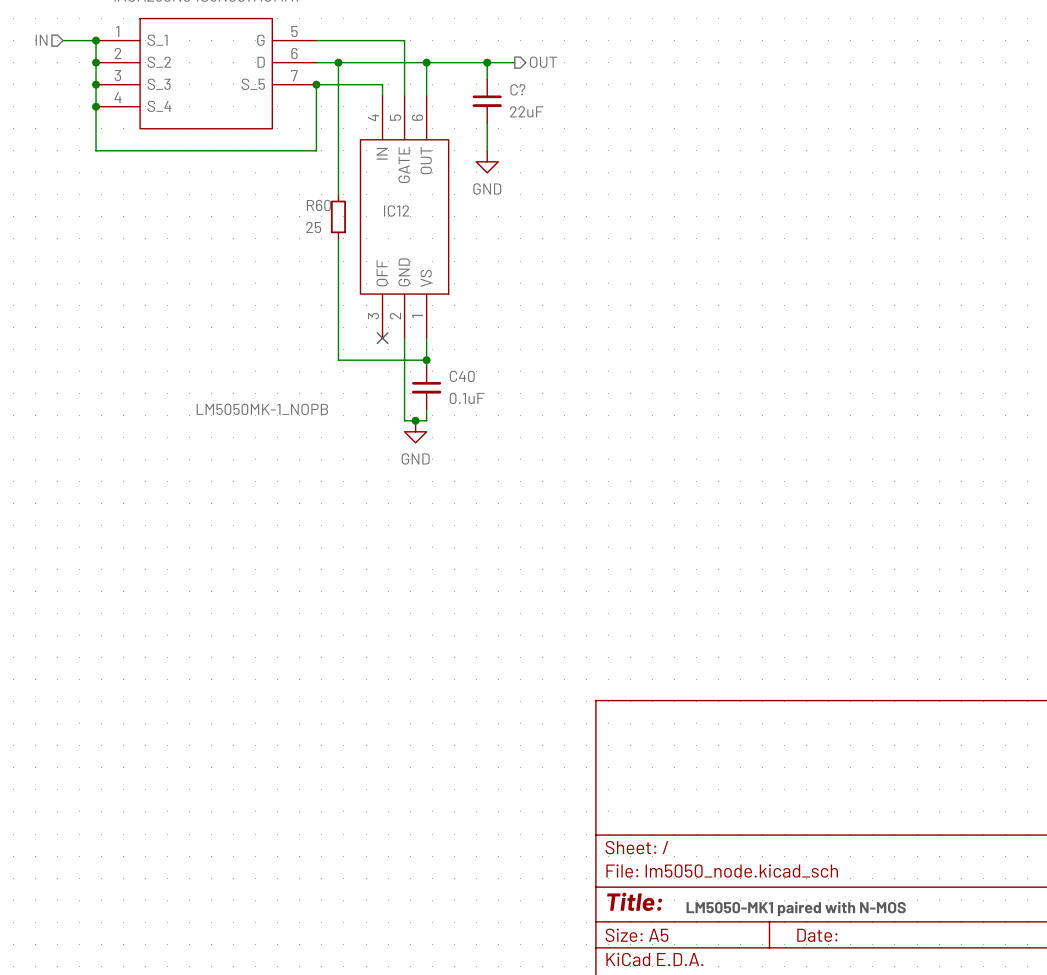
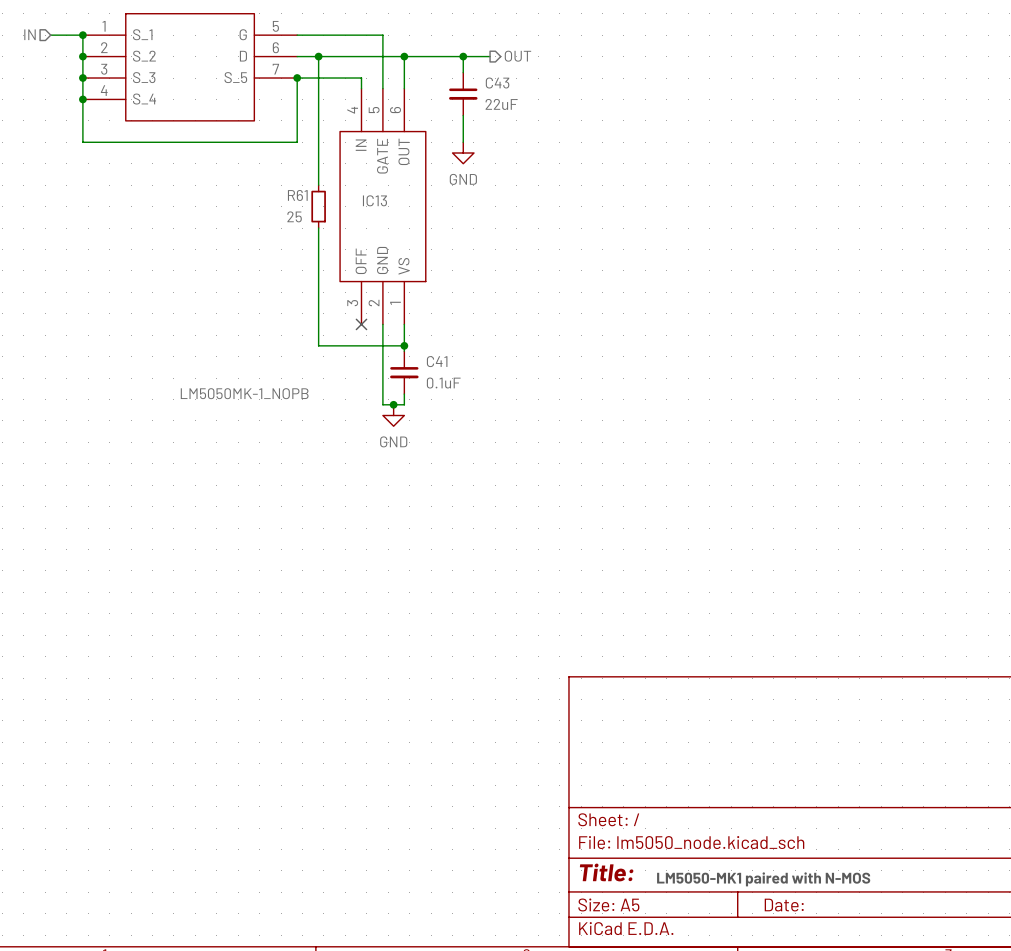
C? name: C? (517, 89) -> C43 (497, 83)
R60 name: R60 (318, 205) -> R61 (297, 195)
IC12 name: IC12 (396, 211) -> IC13 (374, 200)
C40 name: C40 (462, 376) -> C41 (437, 361)

